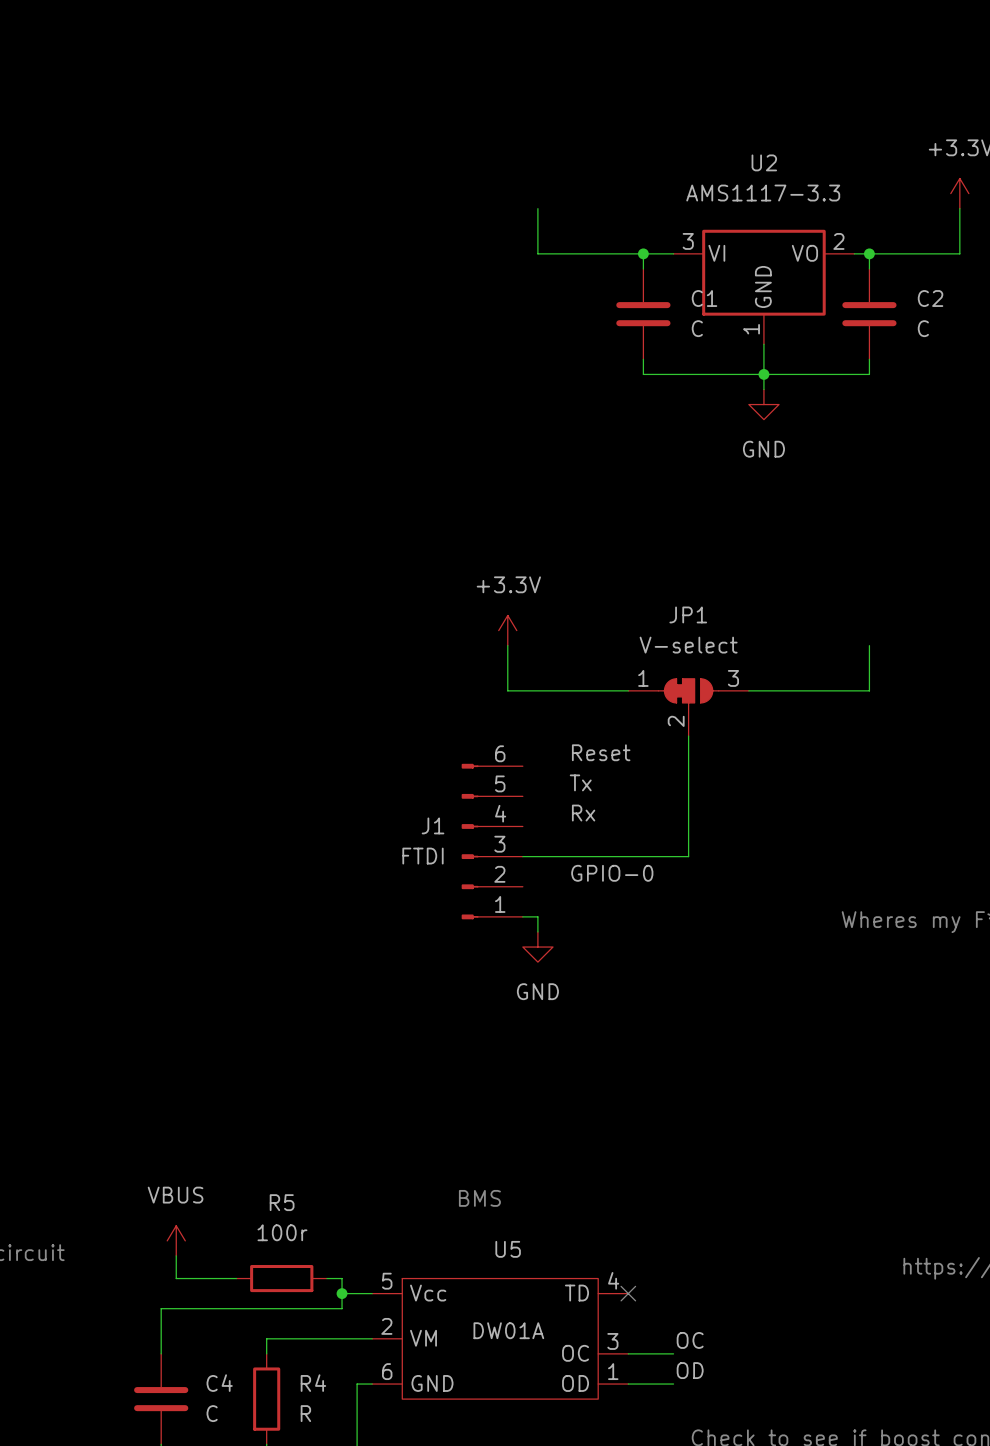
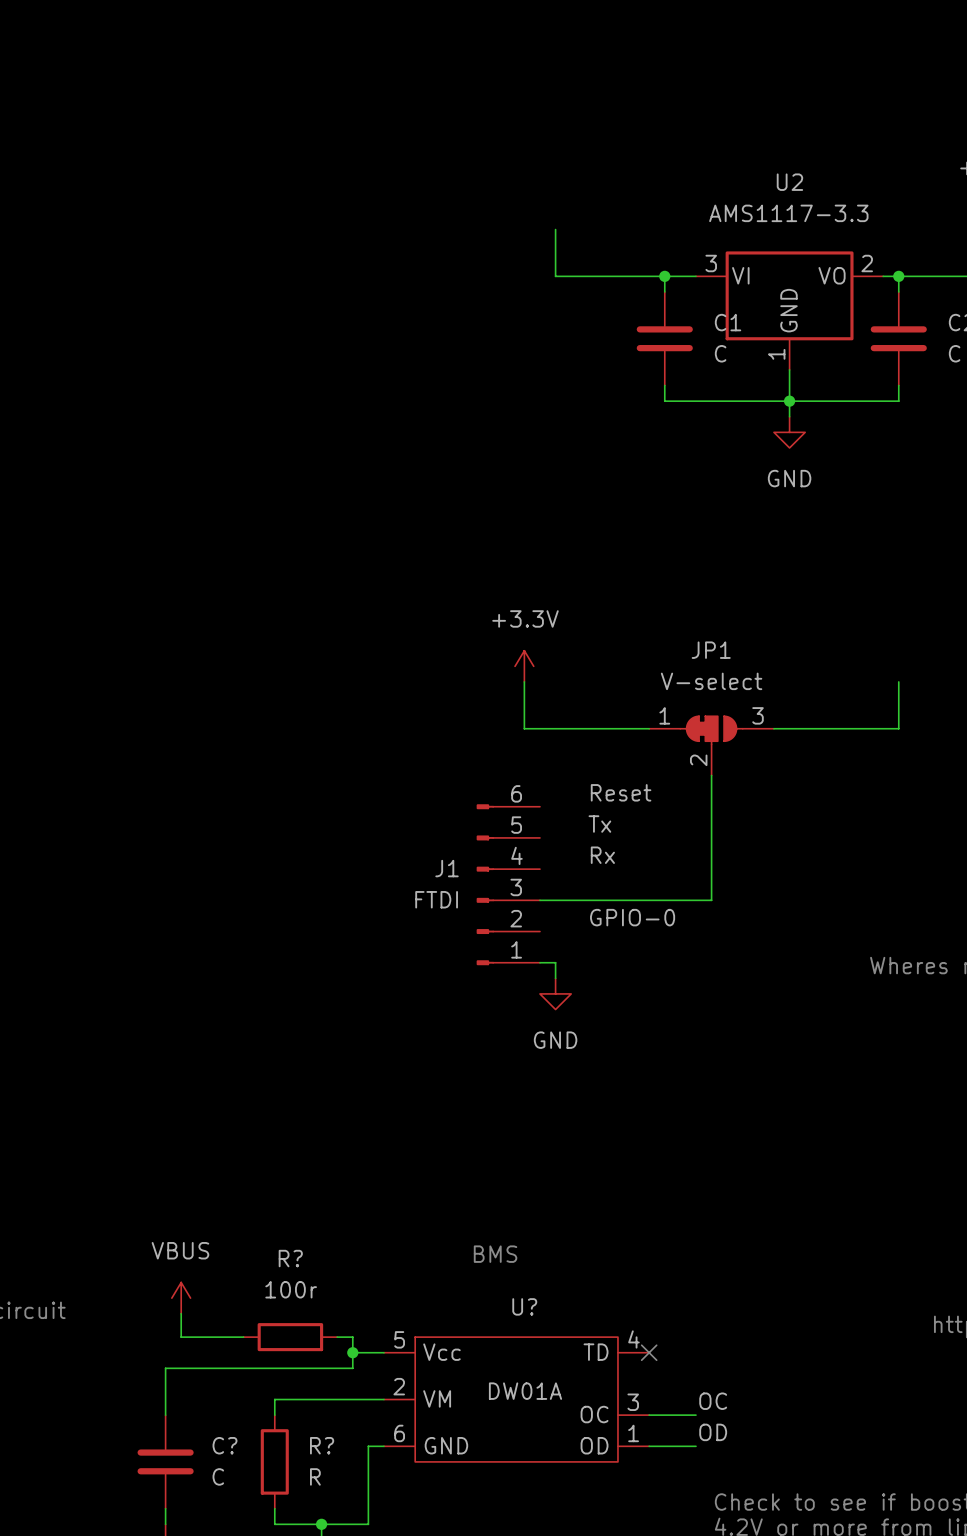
R5 name: R5 (282, 1202) -> R? (290, 1258)
U5 name: U5 (508, 1249) -> U? (524, 1306)
C4 name: C4 (219, 1383) -> C? (224, 1445)
R4 name: R4 (313, 1383) -> R? (322, 1445)

